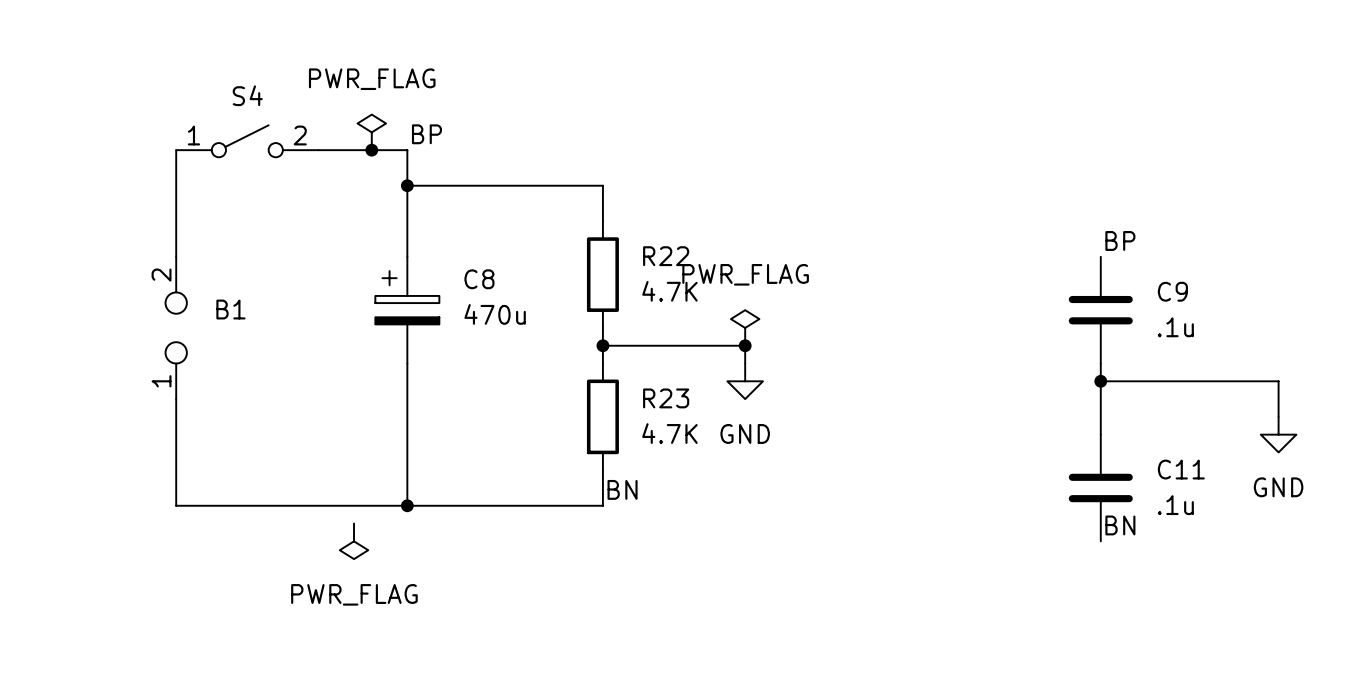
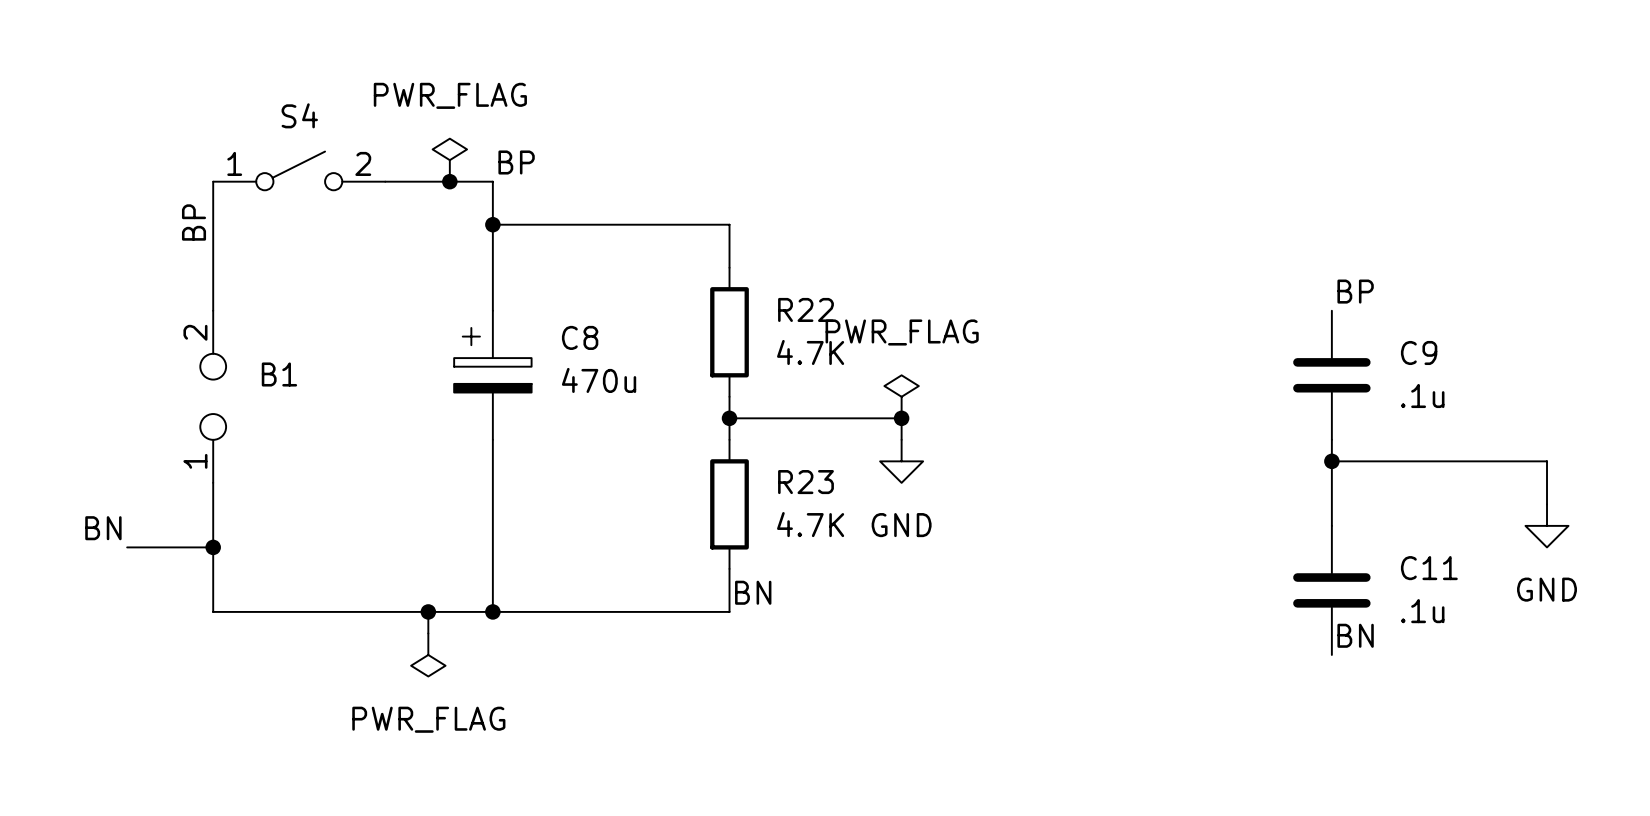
label: none -> BP (194, 222)
label: none -> BN (103, 528)
wire: none -> (127, 547) (213, 547)
junction: none -> (213, 547)
wire: none -> (428, 611) (428, 633)
junction: none -> (428, 611)

